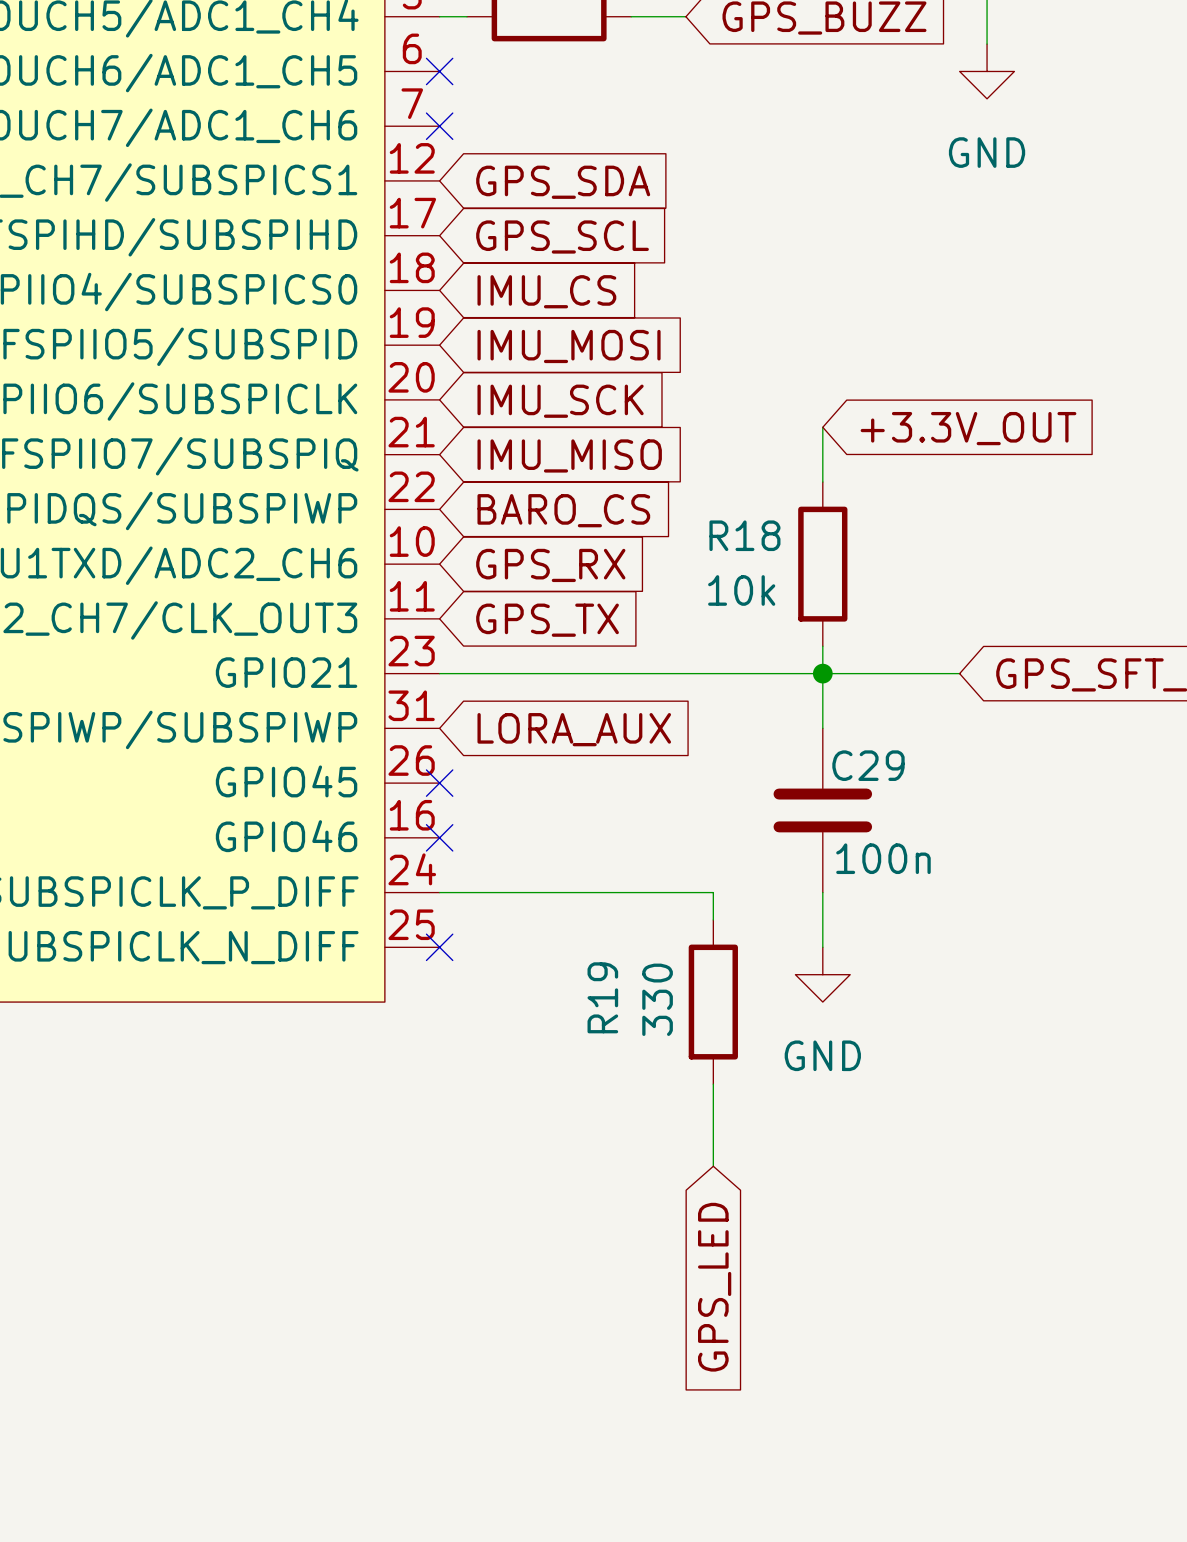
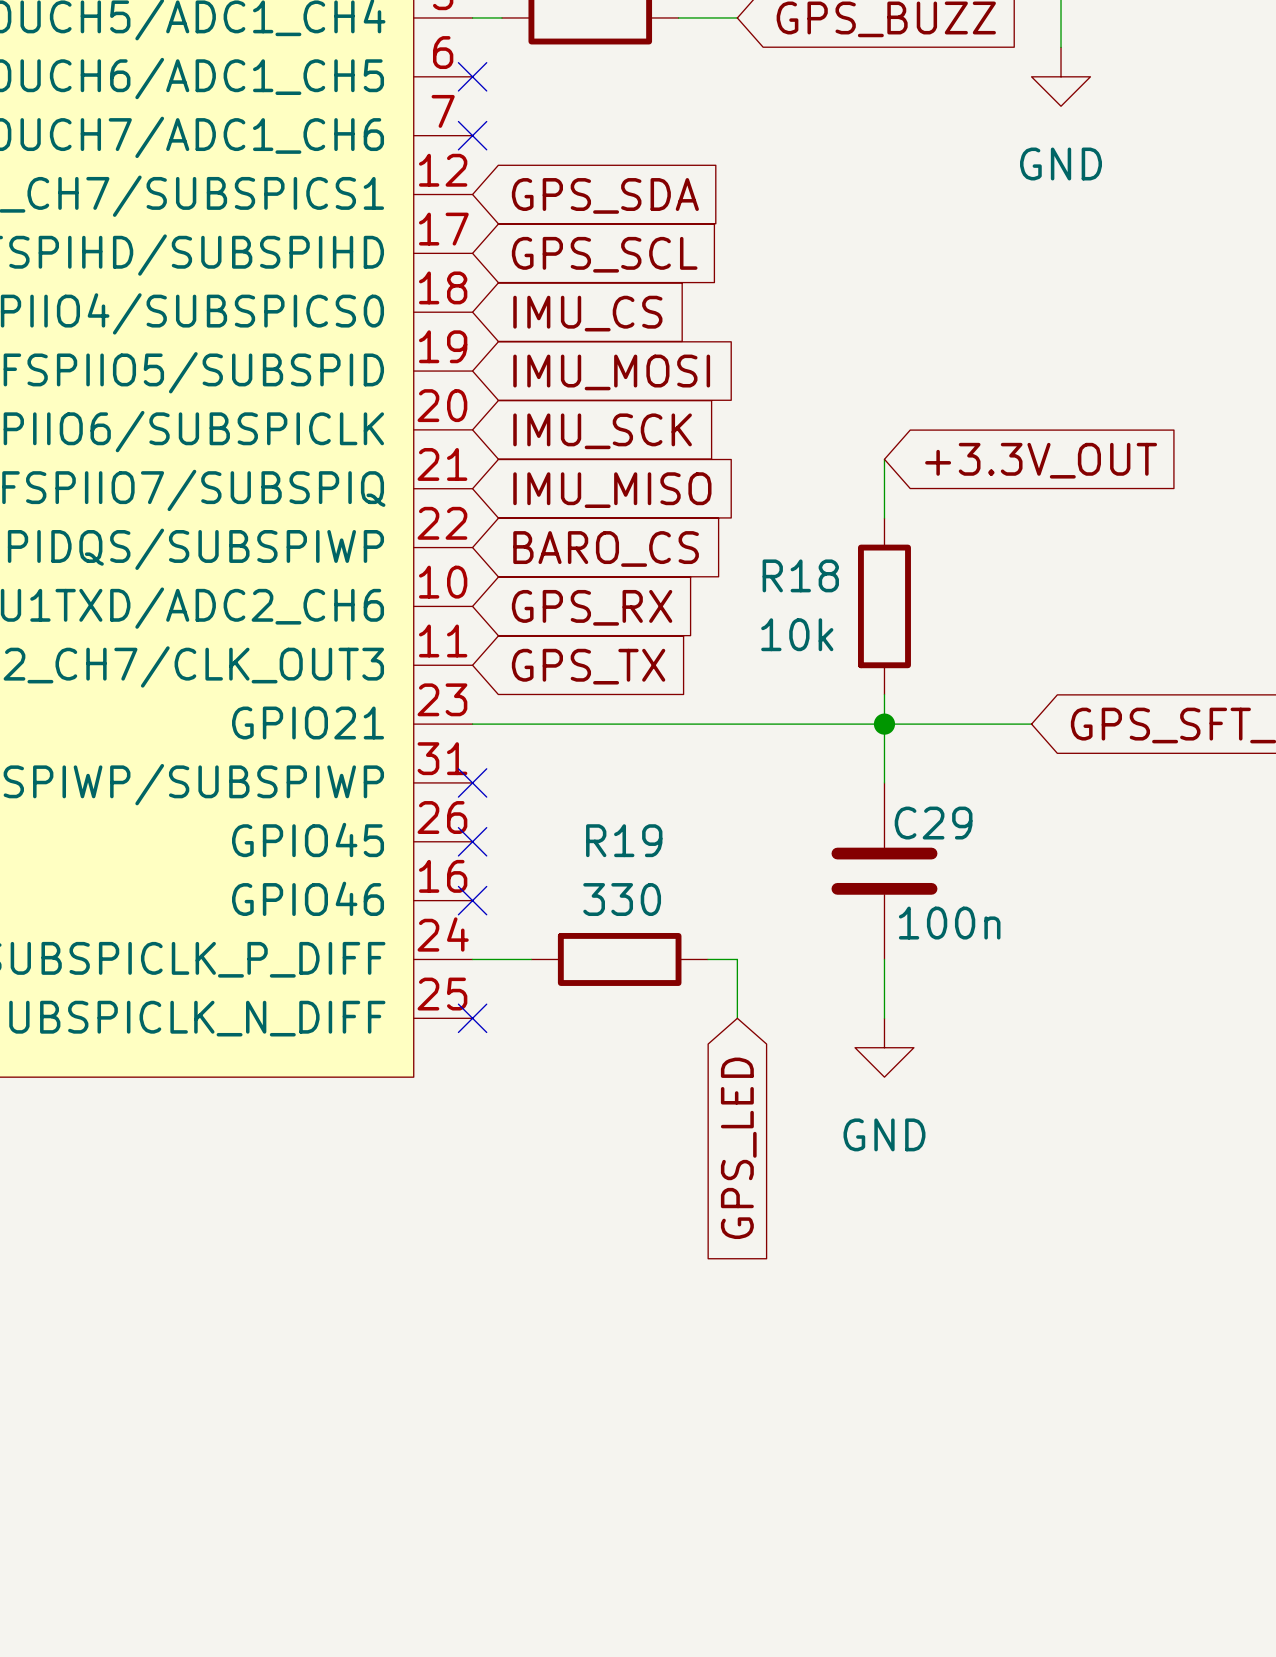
no-connect mark: none -> (472, 782)
global label: LORA_AUX (574, 729) -> none
wire: (494, 892) (658, 892) -> none
wire: (685, 892) (713, 892) (713, 919) -> (737, 959) (737, 1018)
R19 rotation: 0° (713, 1002) -> 90° clockwise (619, 959)
R19 position: (713, 1002) -> (619, 959)
global label position: GPS_LED (714, 1287) -> GPS_LED (738, 1148)

